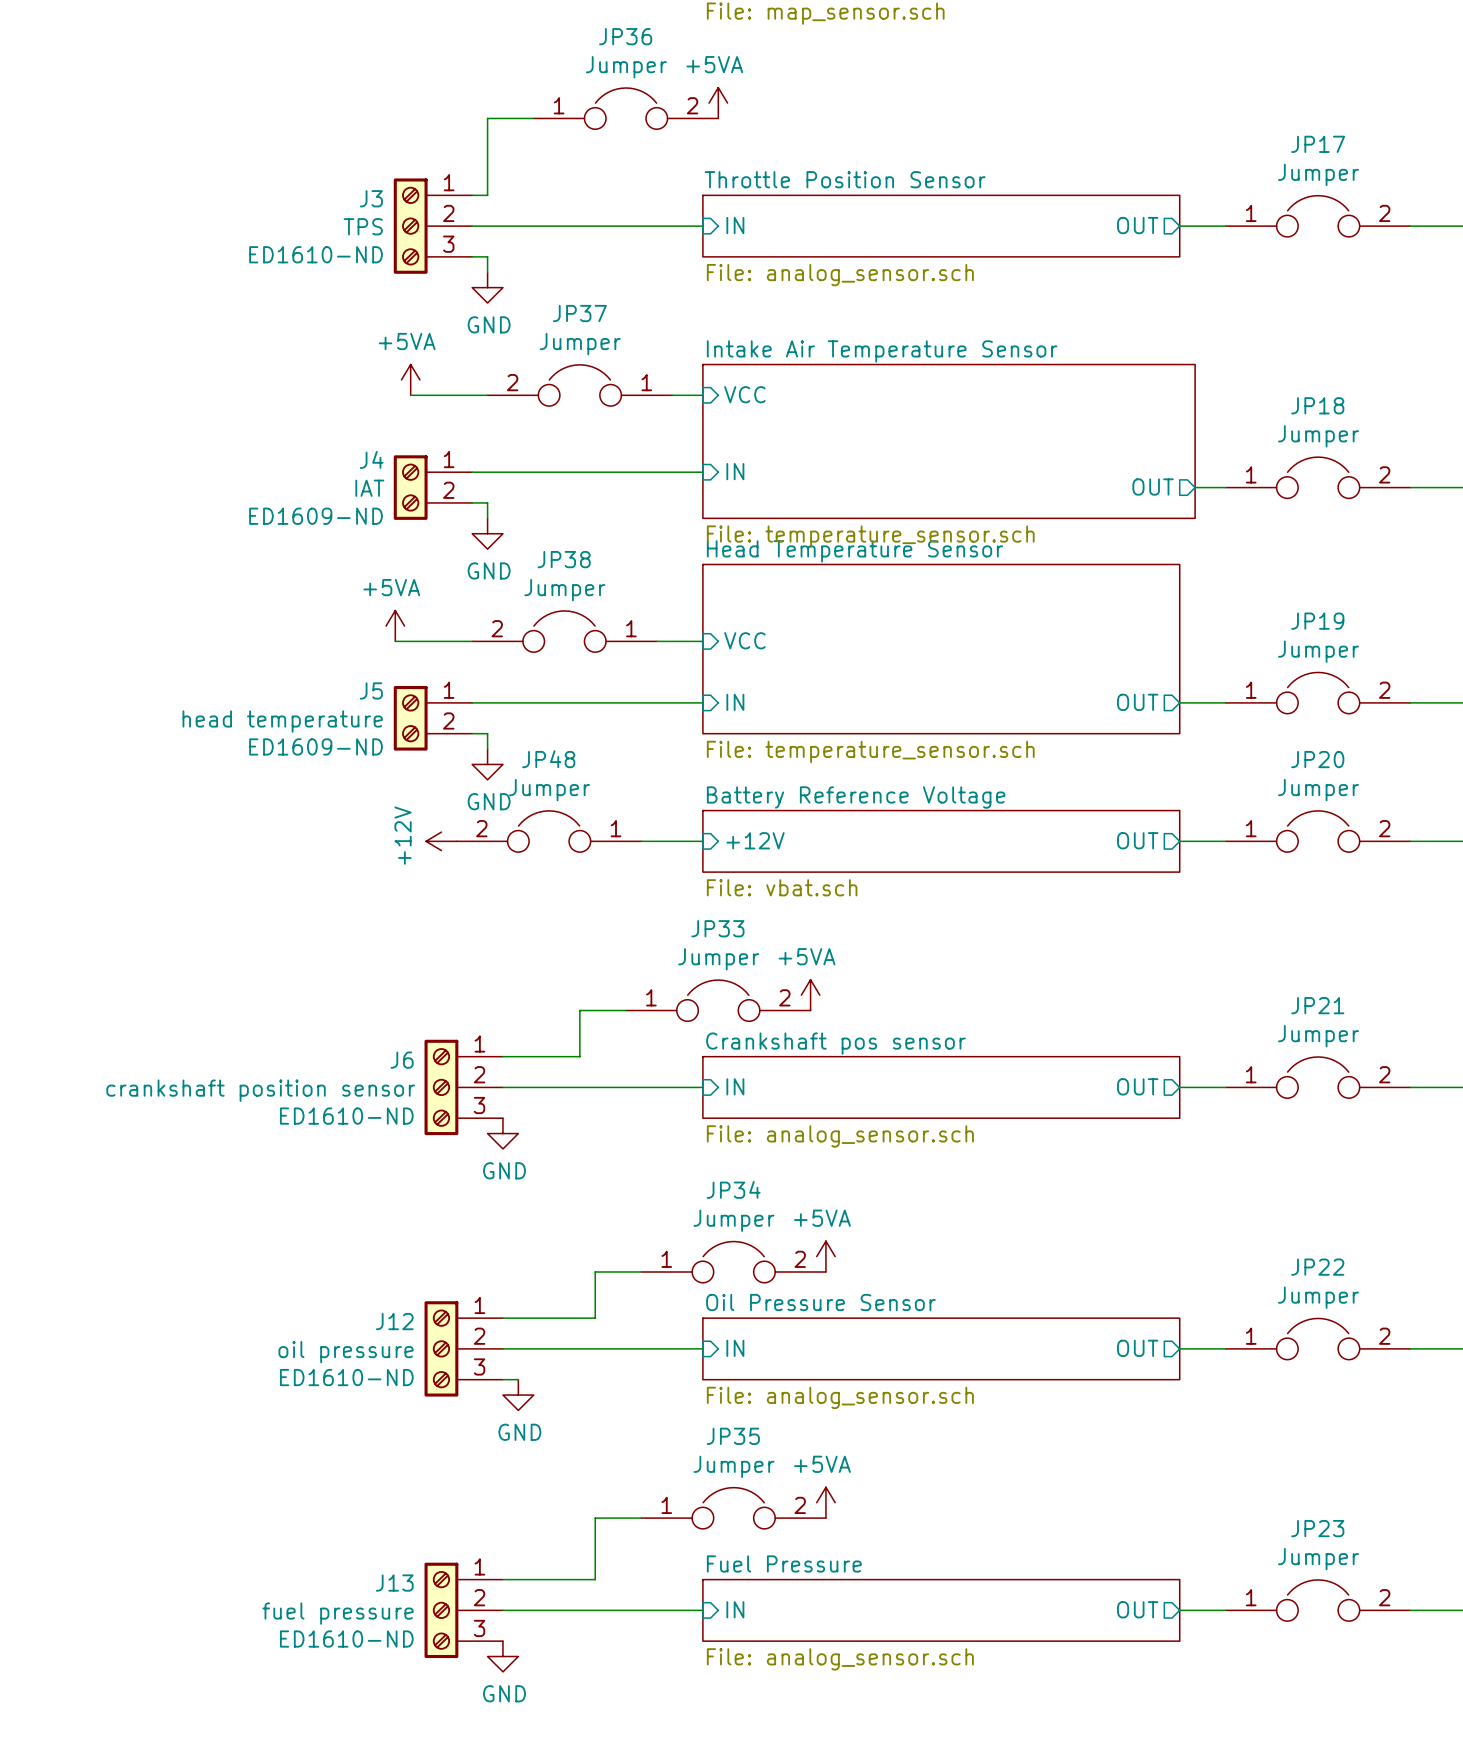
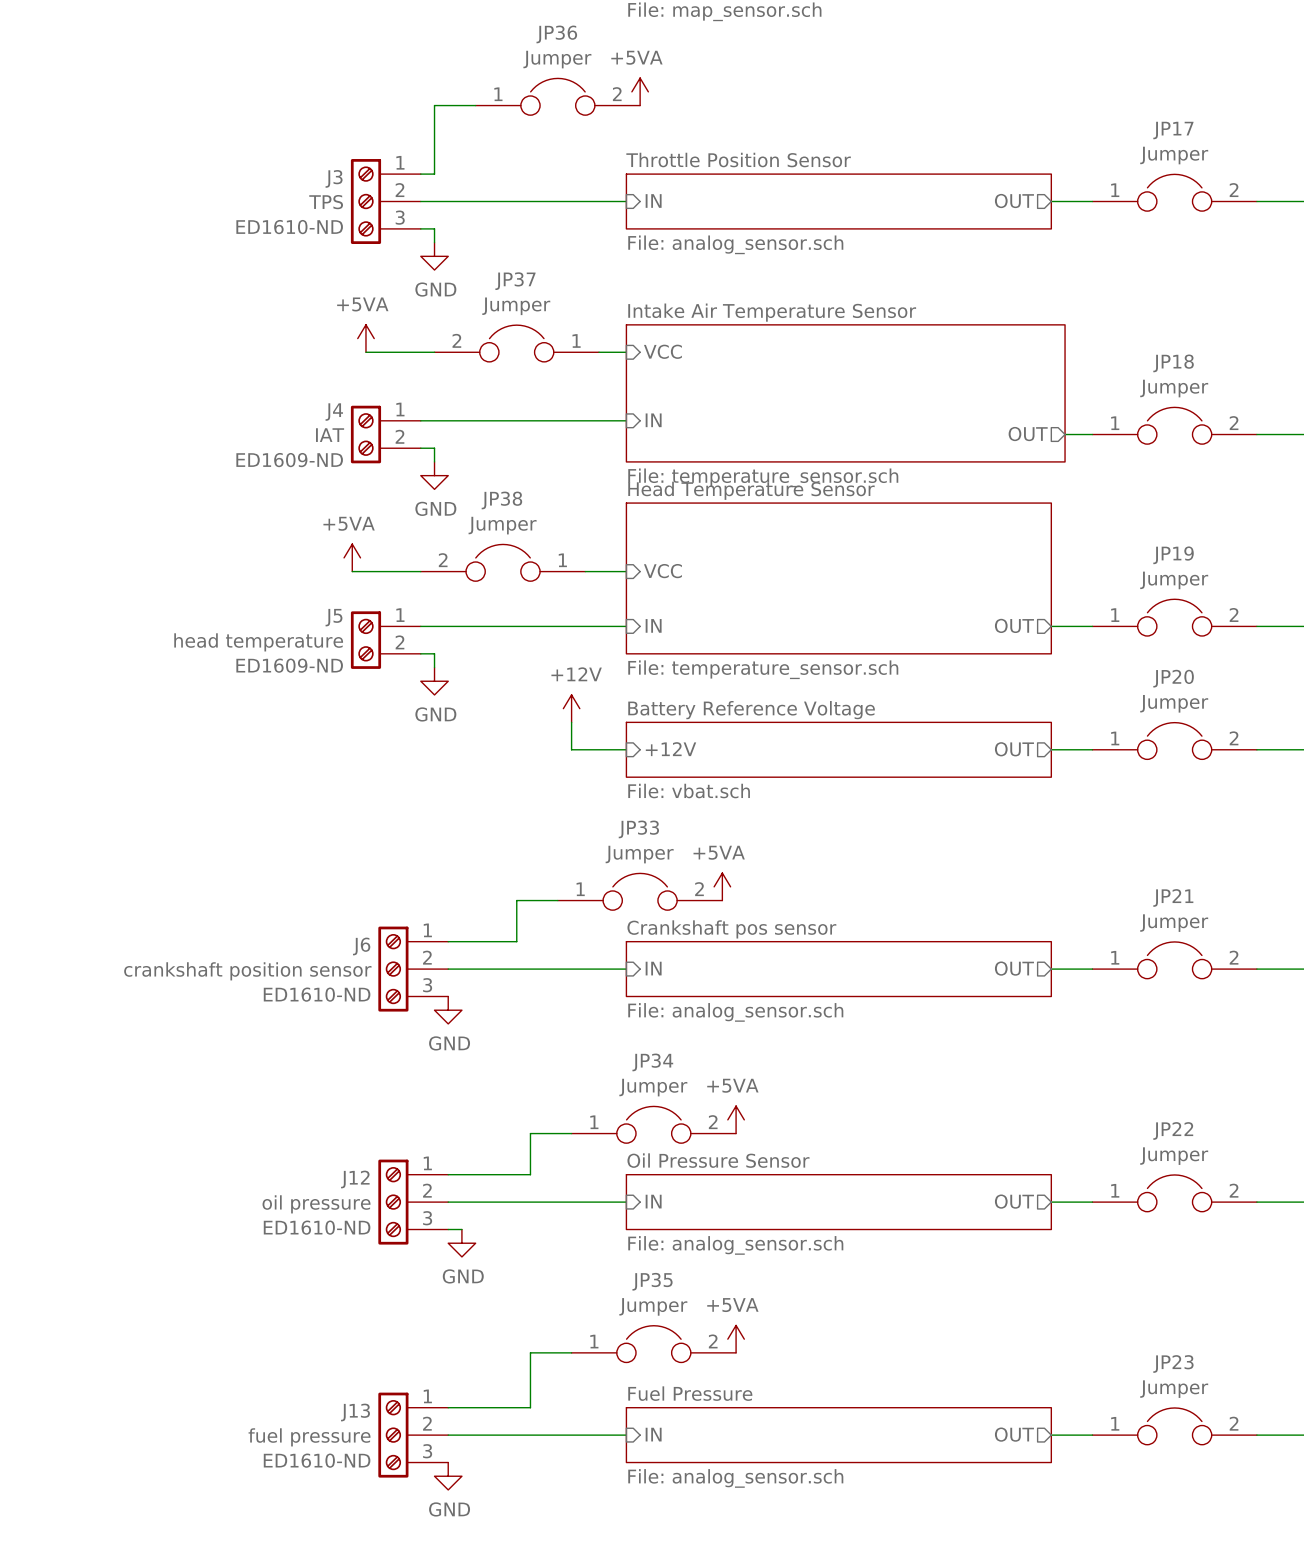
wire: none -> (571, 722) (571, 749)
JP48: Jumper (549, 831) -> none
power symbol rotation: 0° (441, 841) -> 90° clockwise (571, 708)
power symbol position: +12V (441, 841) -> +12V (571, 708)

